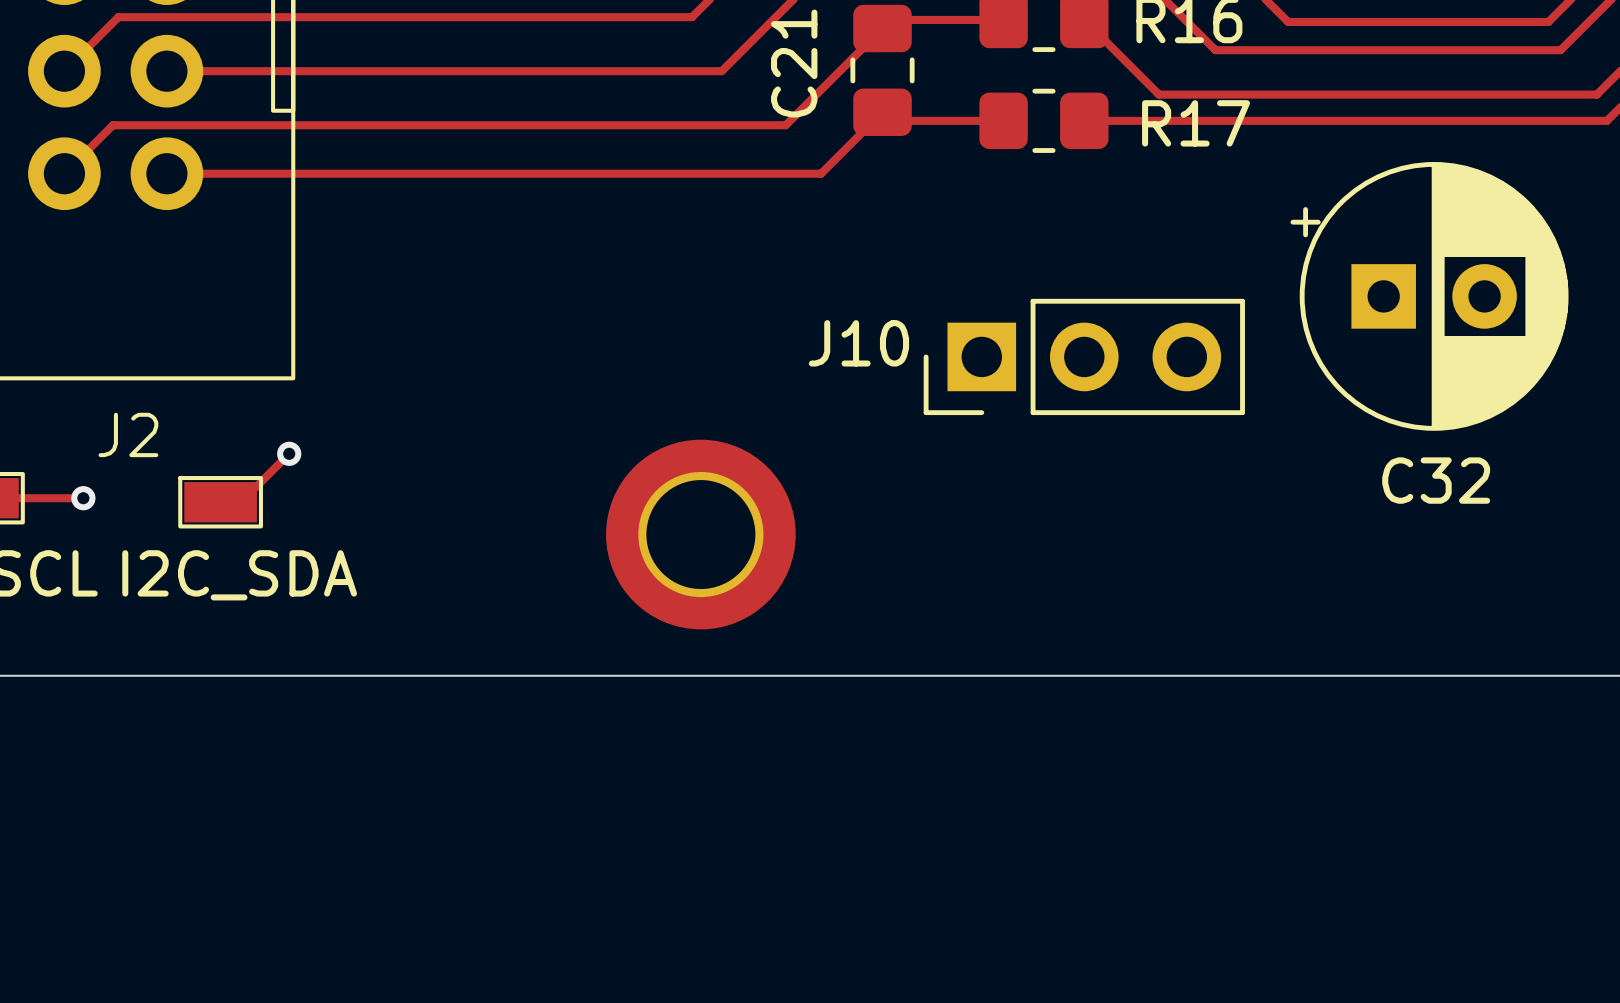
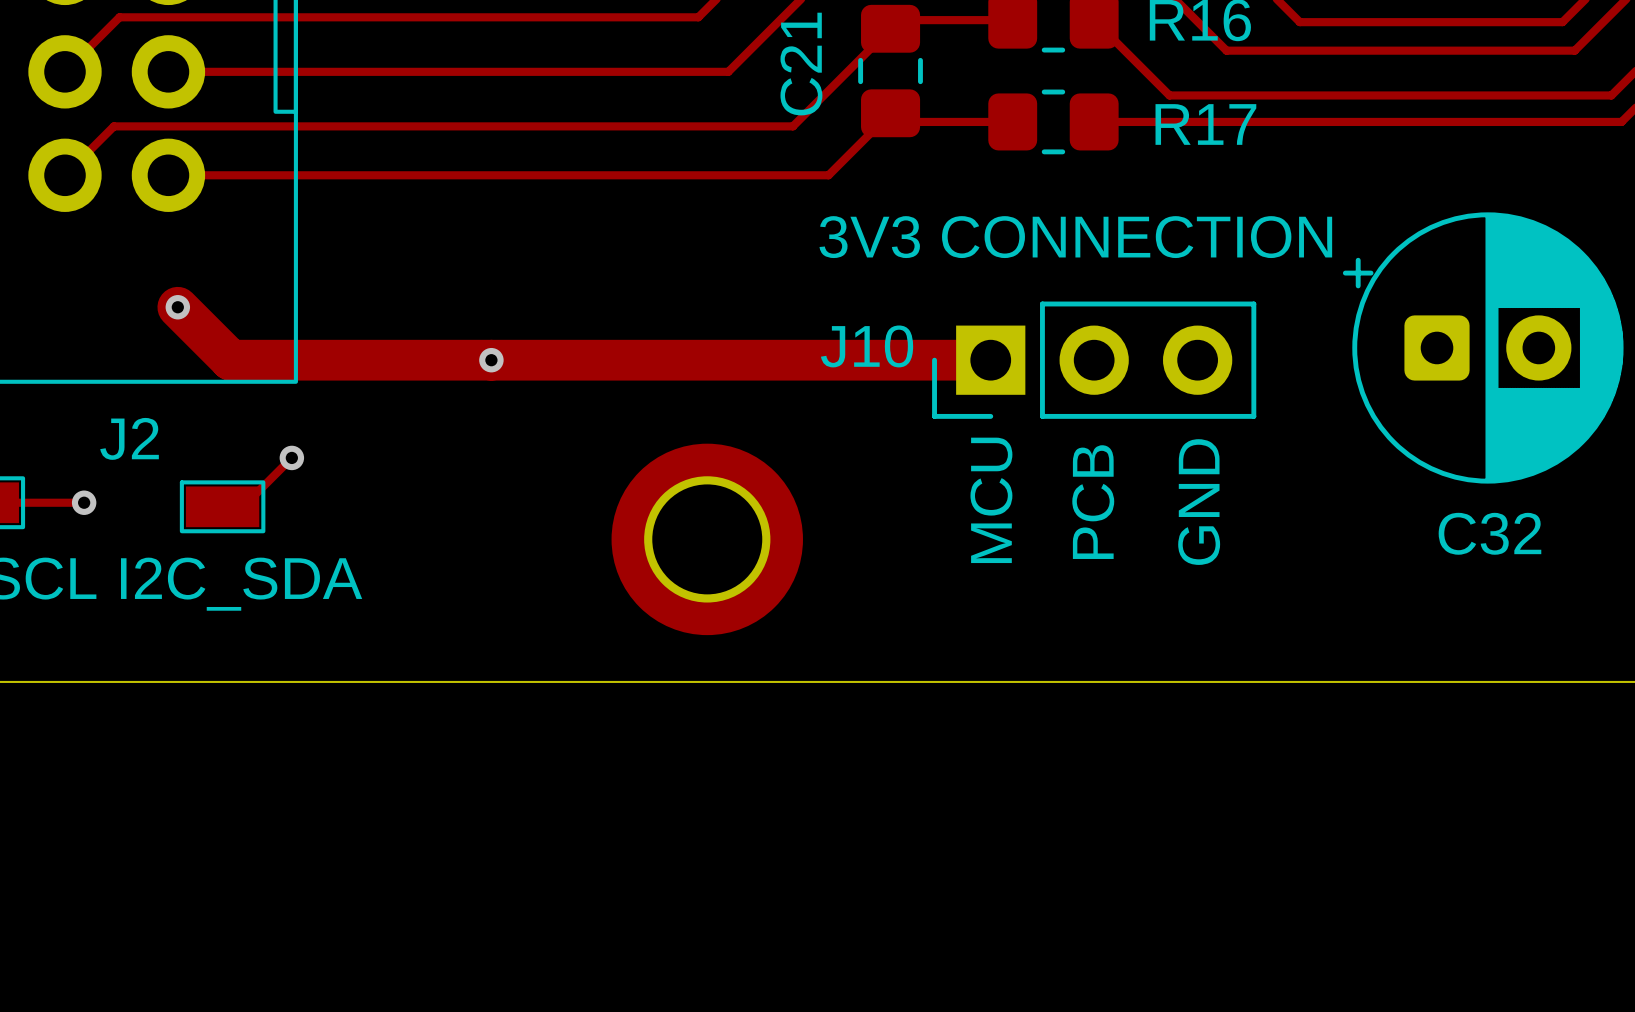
C32 footprint: [1290, 162, 1569, 431] -> [1342, 212, 1624, 484]
text: none -> 3V3 CONNECTION (1075, 237)
track: none -> (177, 307) (230, 360) (990, 360)
via: none -> (177, 307)
via: none -> (491, 360)
text: none -> PCB (1093, 502)
text: none -> MCU (991, 500)
text: none -> GND (1199, 502)

